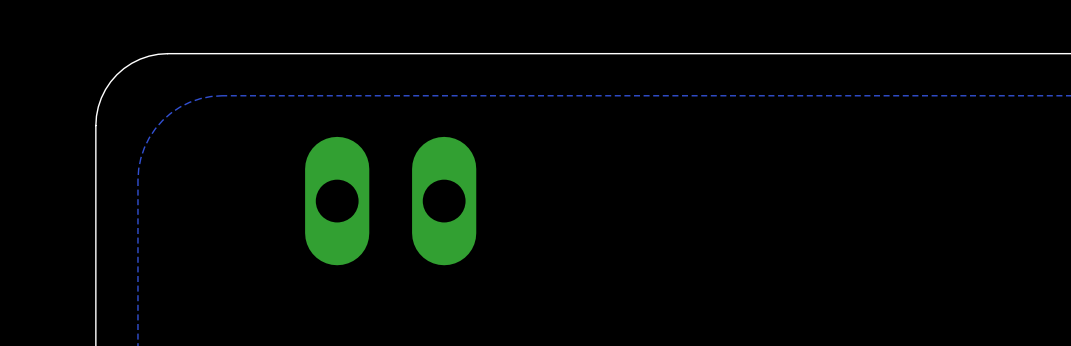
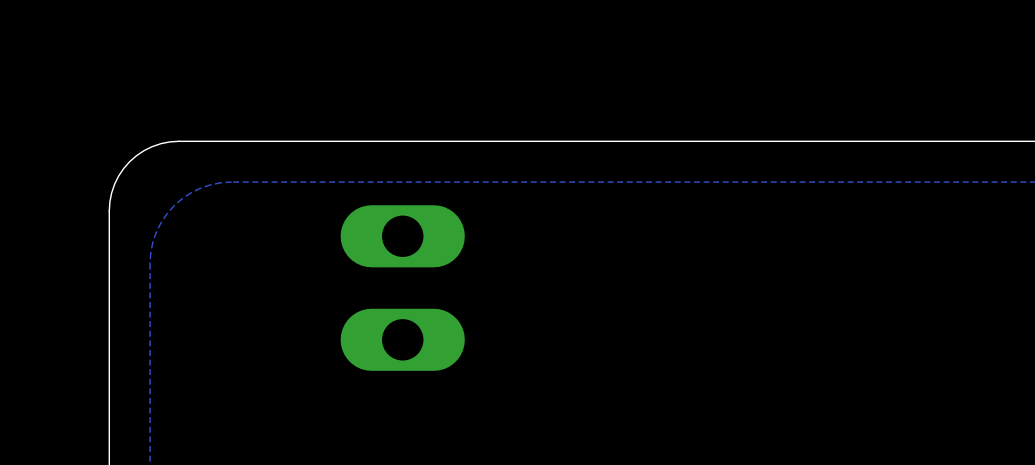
part rotation: 0° (390, 201) -> 90° clockwise (402, 288)

